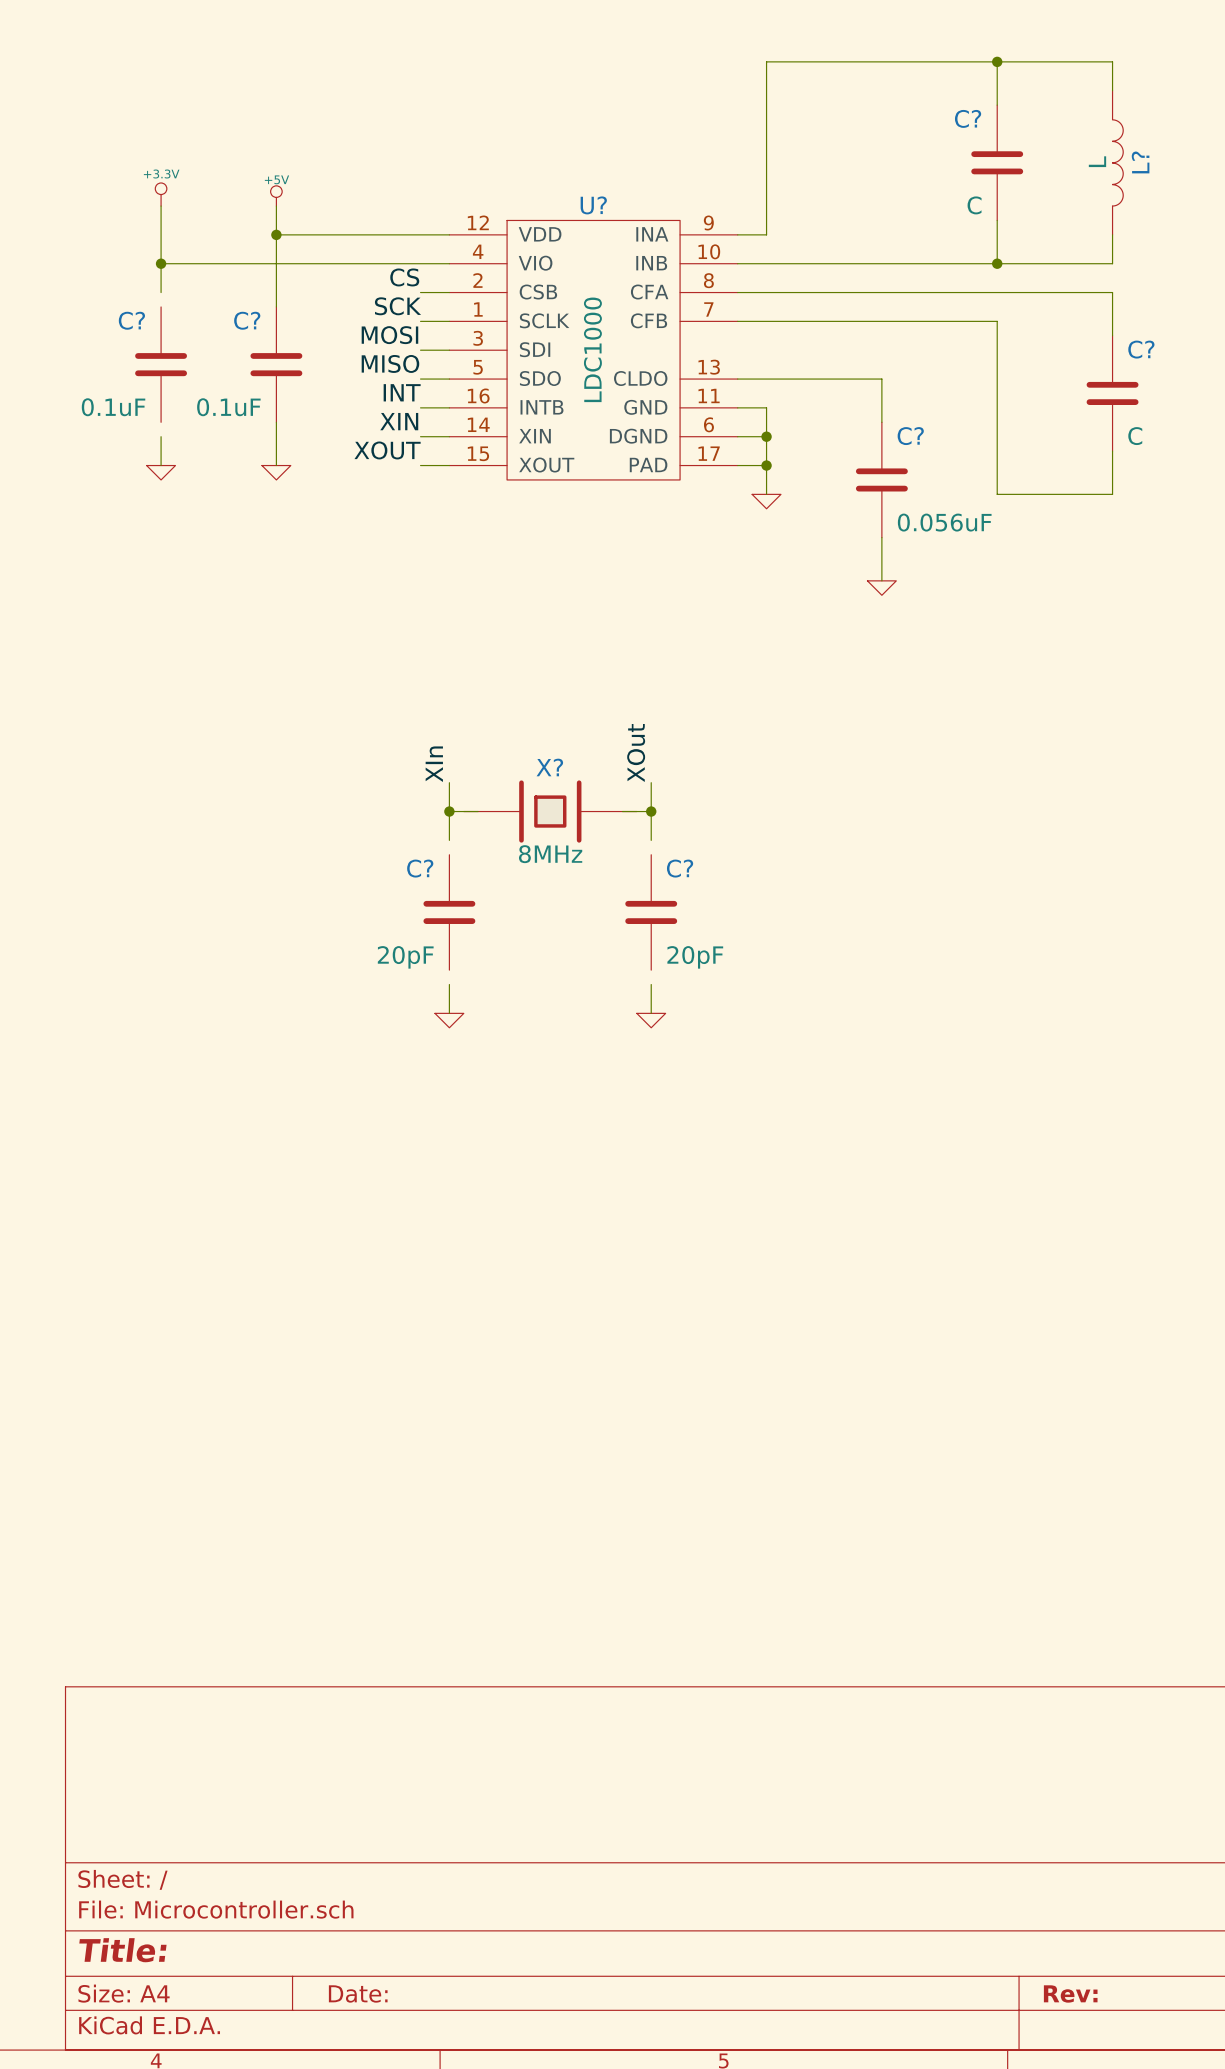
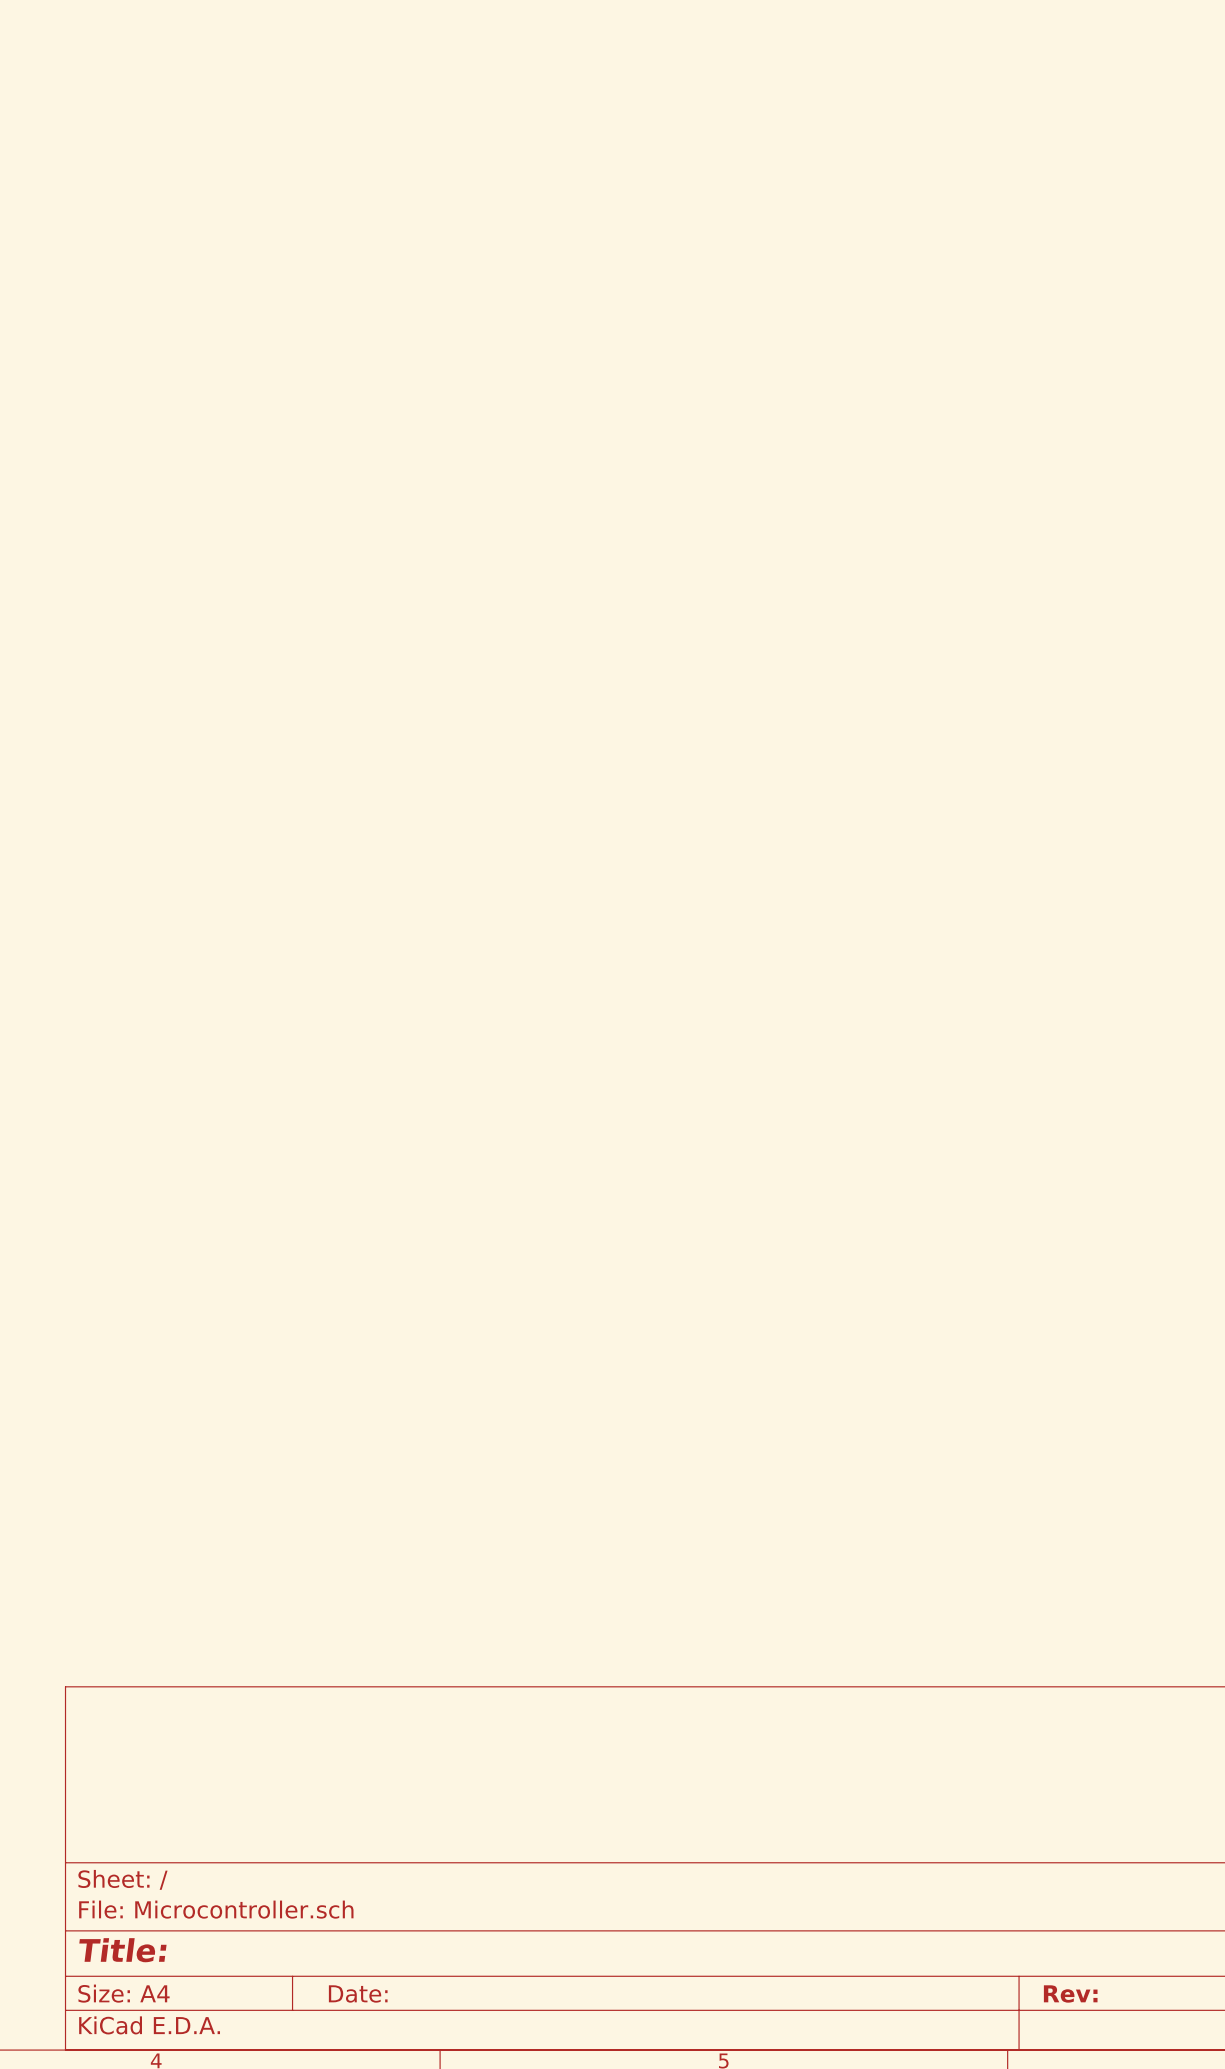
wire: (997, 61) (997, 105) -> none
junction: (997, 61) -> none
wire: (1112, 90) (1112, 61) (766, 61) (766, 234) (737, 234) -> none
C?: C (997, 162) -> none
L?: L (1117, 162) -> none
power symbol: +3.3V (161, 194) -> none
power symbol: +5V (276, 195) -> none
wire: (161, 206) (161, 292) -> none
wire: (276, 206) (276, 306) -> none
wire: (997, 220) (997, 263) -> none
wire: (276, 234) (449, 234) -> none
junction: (276, 234) -> none
wire: (1112, 234) (1112, 263) (737, 263) -> none
wire: (161, 263) (449, 263) -> none
junction: (161, 263) -> none
junction: (997, 263) -> none
label: CS (404, 277) -> none
wire: (420, 292) (449, 292) -> none
wire: (737, 292) (1112, 292) (1112, 335) -> none
label: SCK (398, 306) -> none
wire: (420, 321) (449, 321) -> none
wire: (737, 321) (997, 321) (997, 494) (1112, 494) (1112, 451) -> none
label: MOSI (389, 335) -> none
wire: (420, 350) (449, 350) -> none
U?: LDC1000 (593, 350) -> none
label: MISO (390, 363) -> none
C?: 0.1uF (161, 364) -> none
C?: 0.1uF (276, 364) -> none
wire: (420, 379) (449, 379) -> none
wire: (737, 379) (881, 379) (881, 422) -> none
label: INT (402, 392) -> none
C?: C (1112, 393) -> none
wire: (420, 407) (449, 407) -> none
wire: (737, 407) (766, 407) (766, 494) -> none
label: XIN (399, 421) -> none
wire: (276, 422) (276, 465) -> none
wire: (161, 436) (161, 465) -> none
wire: (420, 436) (449, 436) -> none
wire: (737, 436) (766, 436) -> none
junction: (766, 436) -> none
label: XOUT (387, 450) -> none
wire: (420, 465) (449, 465) -> none
wire: (737, 465) (766, 465) -> none
junction: (766, 465) -> none
power symbol: (161, 472) -> none
power symbol: (276, 472) -> none
C?: 0.056uF (881, 479) -> none
power symbol: (766, 501) -> none
wire: (881, 537) (881, 580) -> none
power symbol: (881, 588) -> none
label: XOut (636, 752) -> none
label: XIn (434, 764) -> none
wire: (449, 782) (449, 840) -> none
wire: (651, 782) (651, 840) -> none
wire: (449, 811) (478, 811) -> none
junction: (449, 811) -> none
X?: 8MHz (550, 811) -> none
wire: (622, 811) (651, 811) -> none
junction: (651, 811) -> none
C?: 20pF (449, 912) -> none
C?: 20pF (651, 912) -> none
wire: (449, 984) (449, 1013) -> none
wire: (651, 984) (651, 1013) -> none
power symbol: (449, 1020) -> none
power symbol: (651, 1020) -> none

